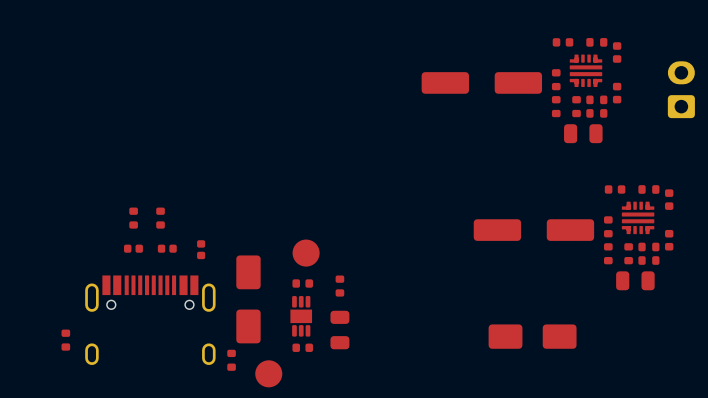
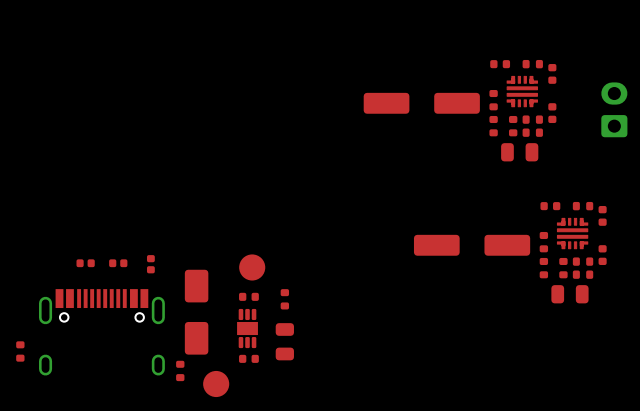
part: (133, 218) -> none
part: (160, 218) -> none
part: (532, 336) -> none

